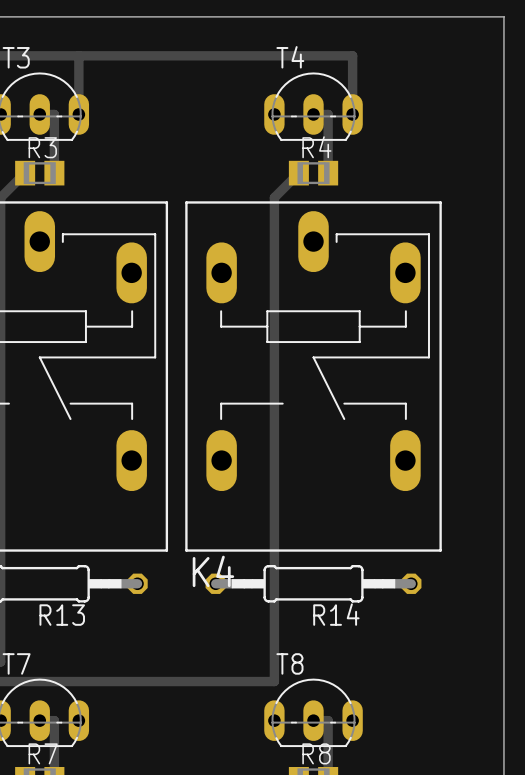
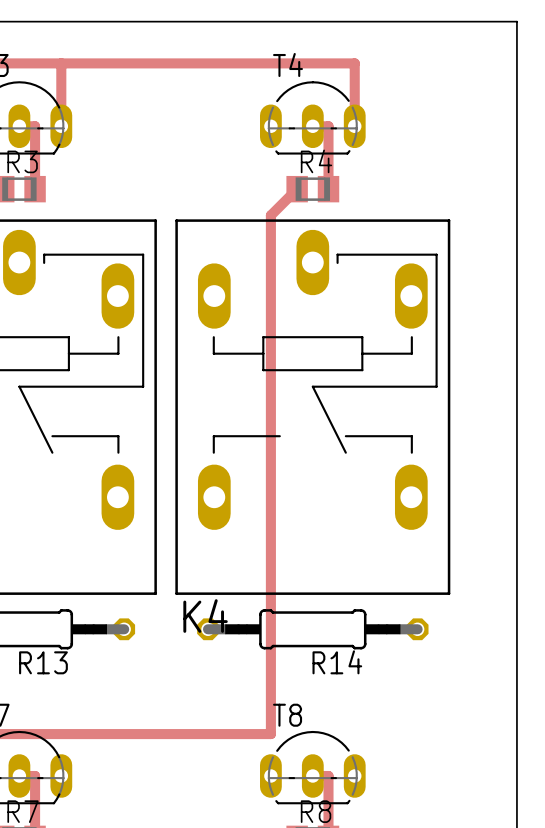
T4 footprint: [264, 72, 363, 141] -> [260, 81, 366, 155]
T8 footprint: [264, 678, 363, 748] -> [260, 730, 366, 805]

